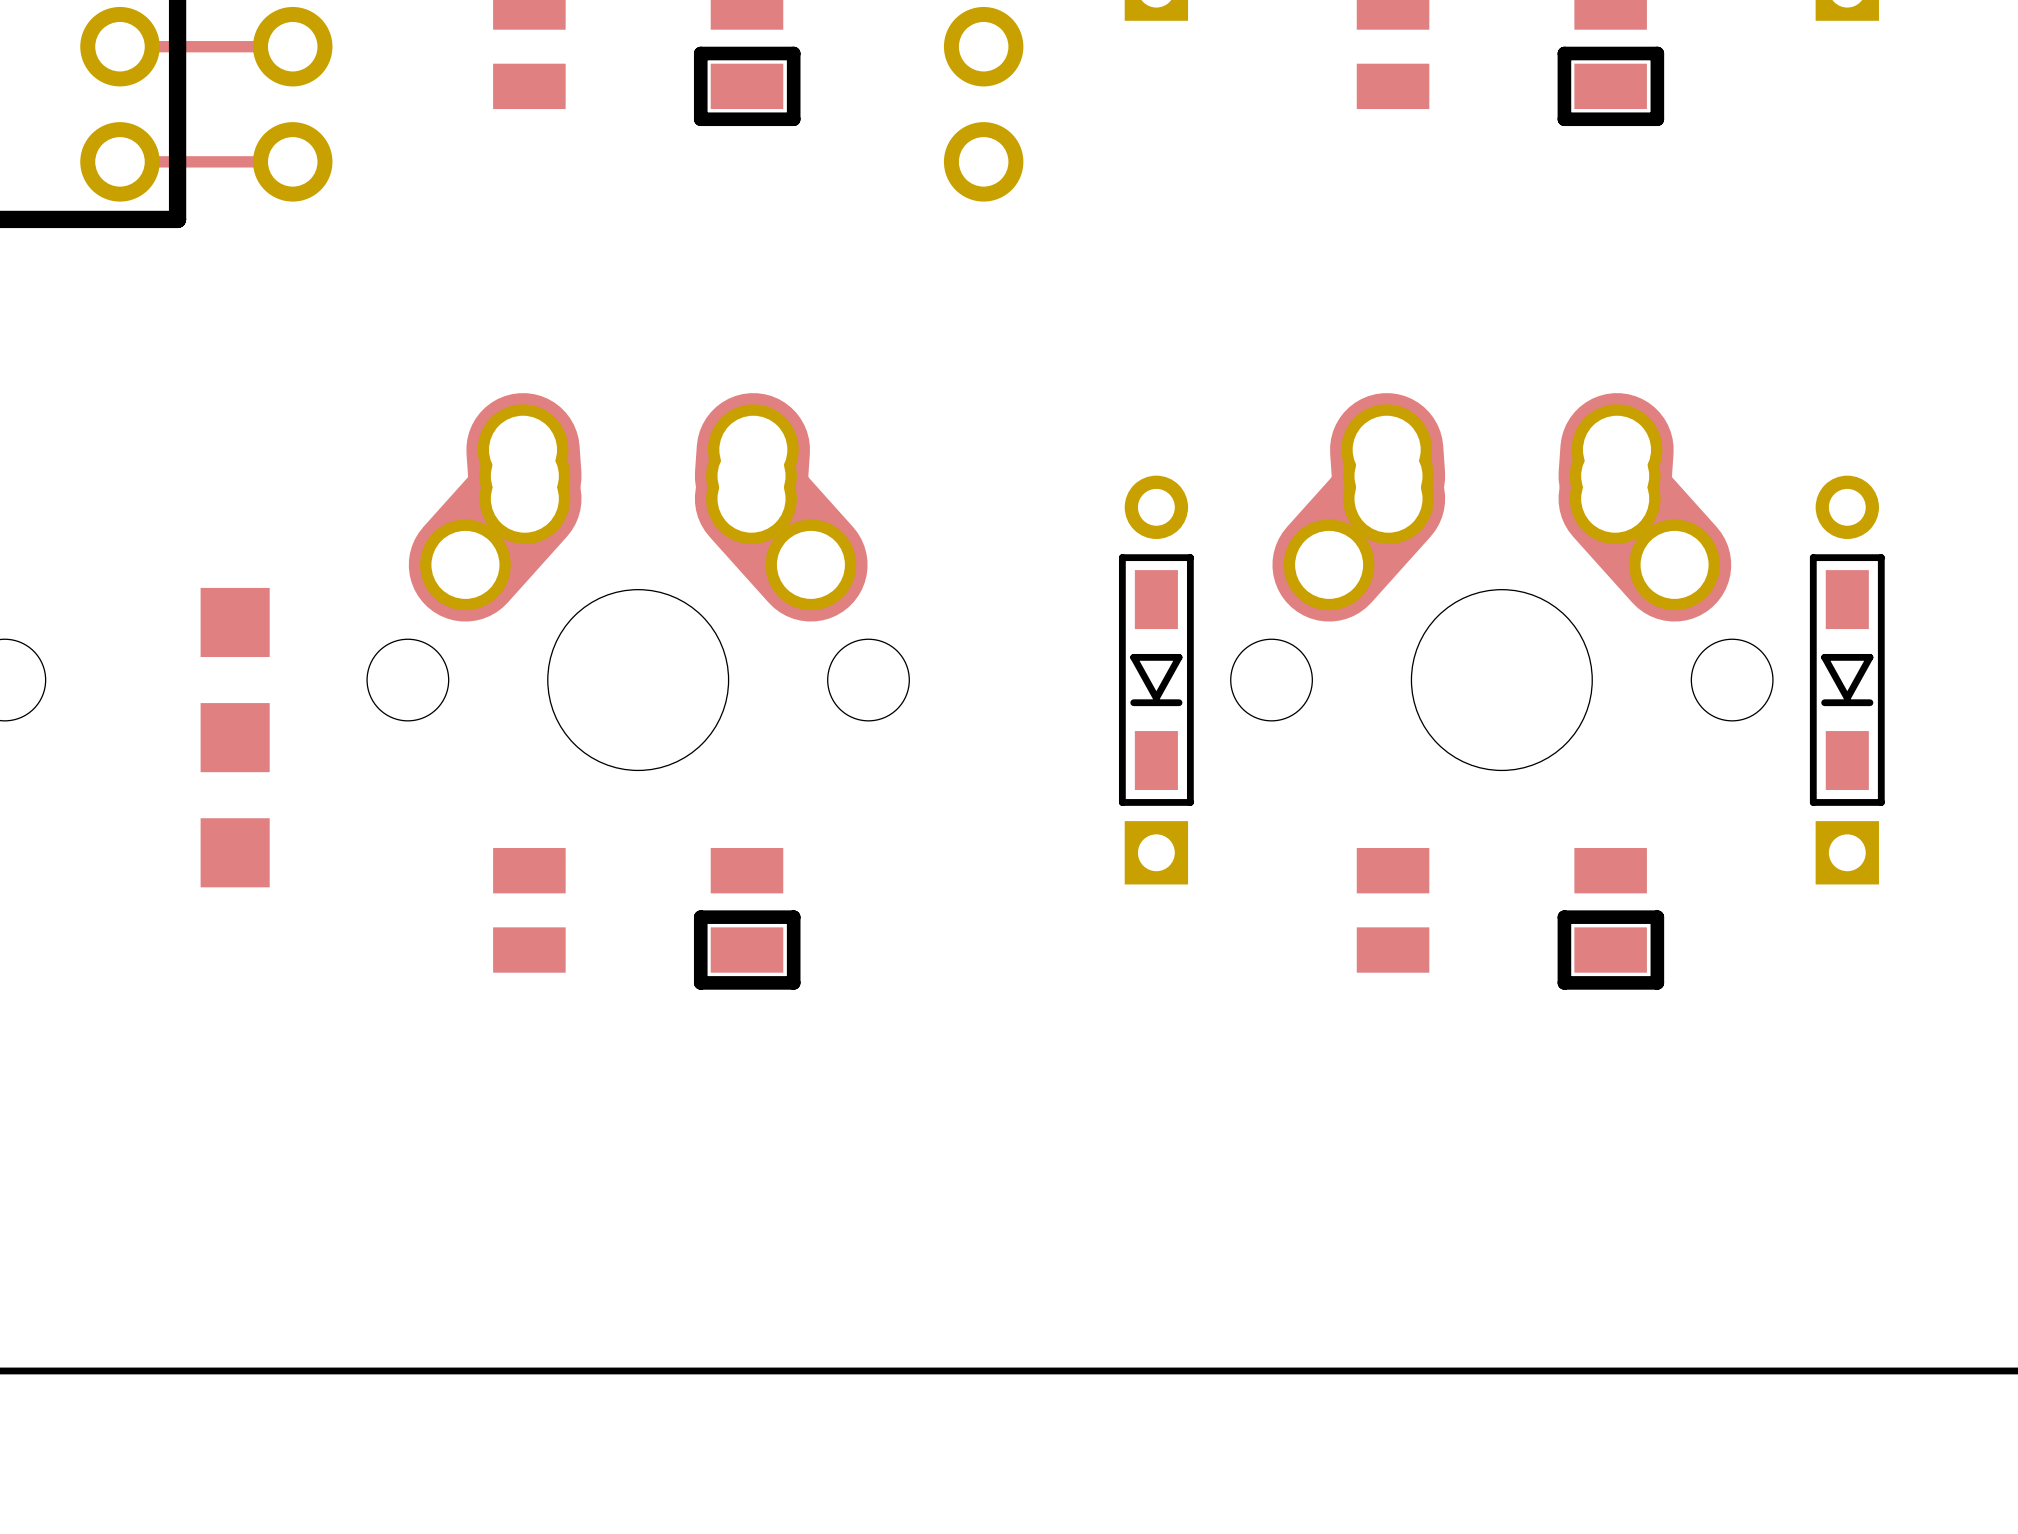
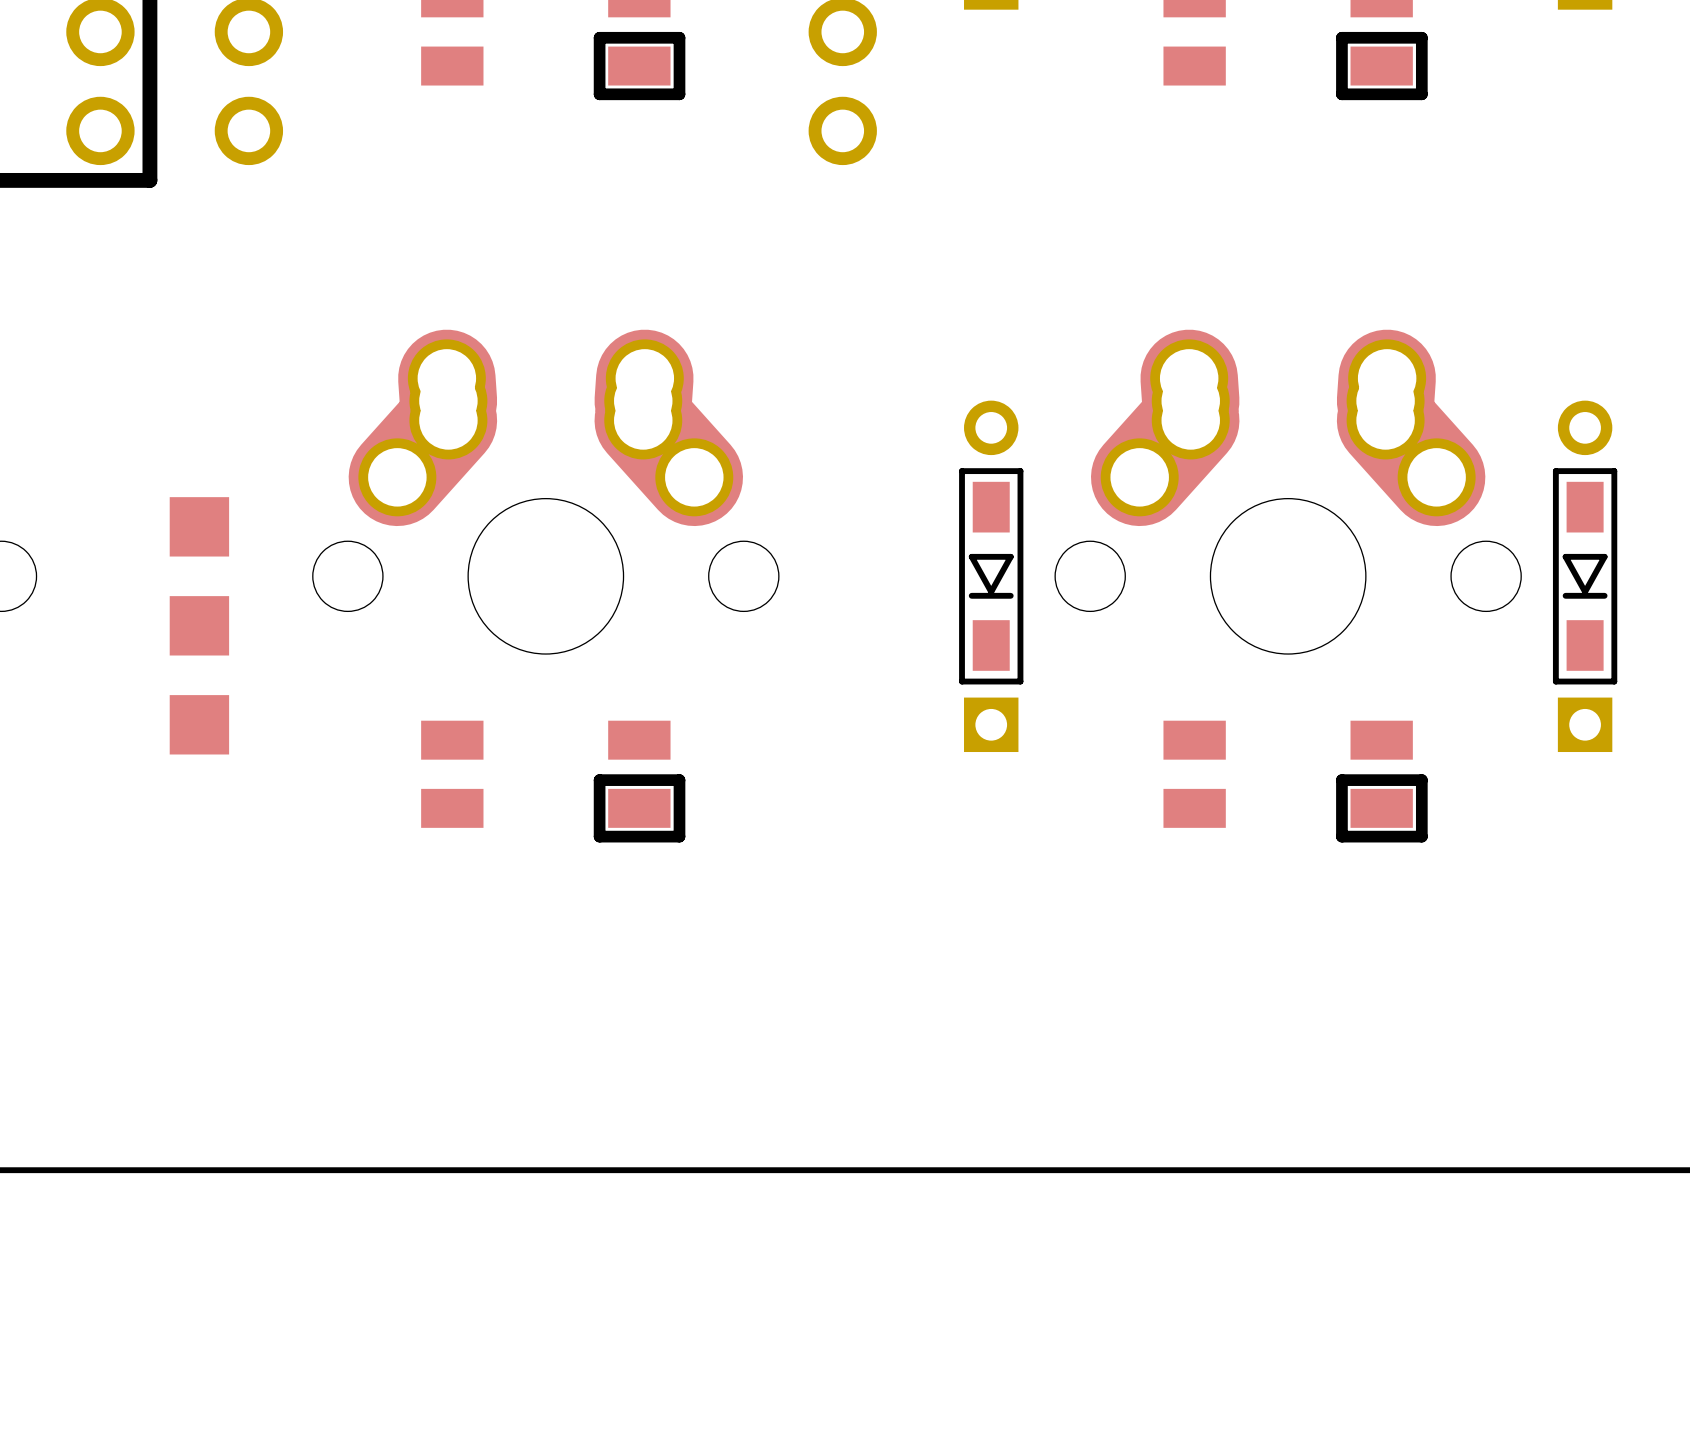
track: (120, 46) (292, 46) -> none
track: (120, 161) (292, 161) -> none

